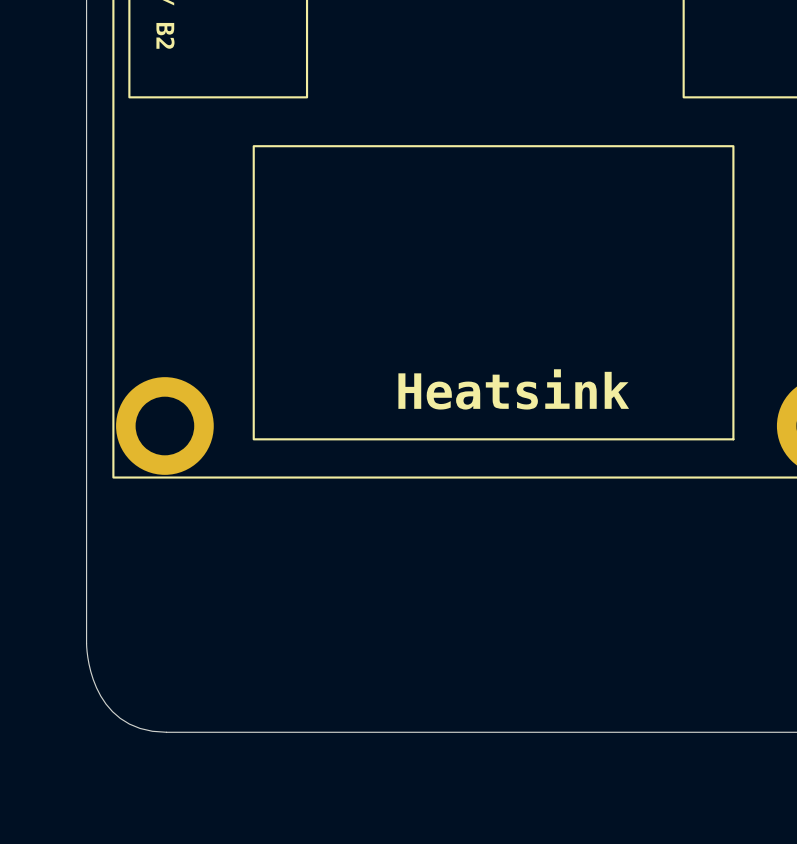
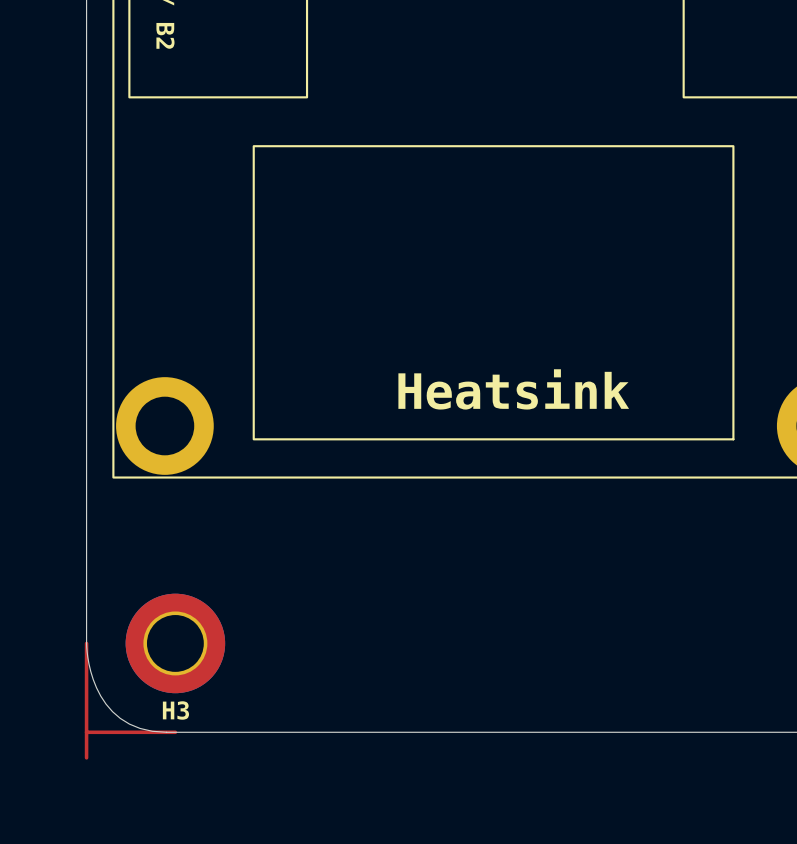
top track: none -> (86, 643) (86, 757)
H3: none -> (175, 643)
top track: none -> (86, 732) (175, 732)

